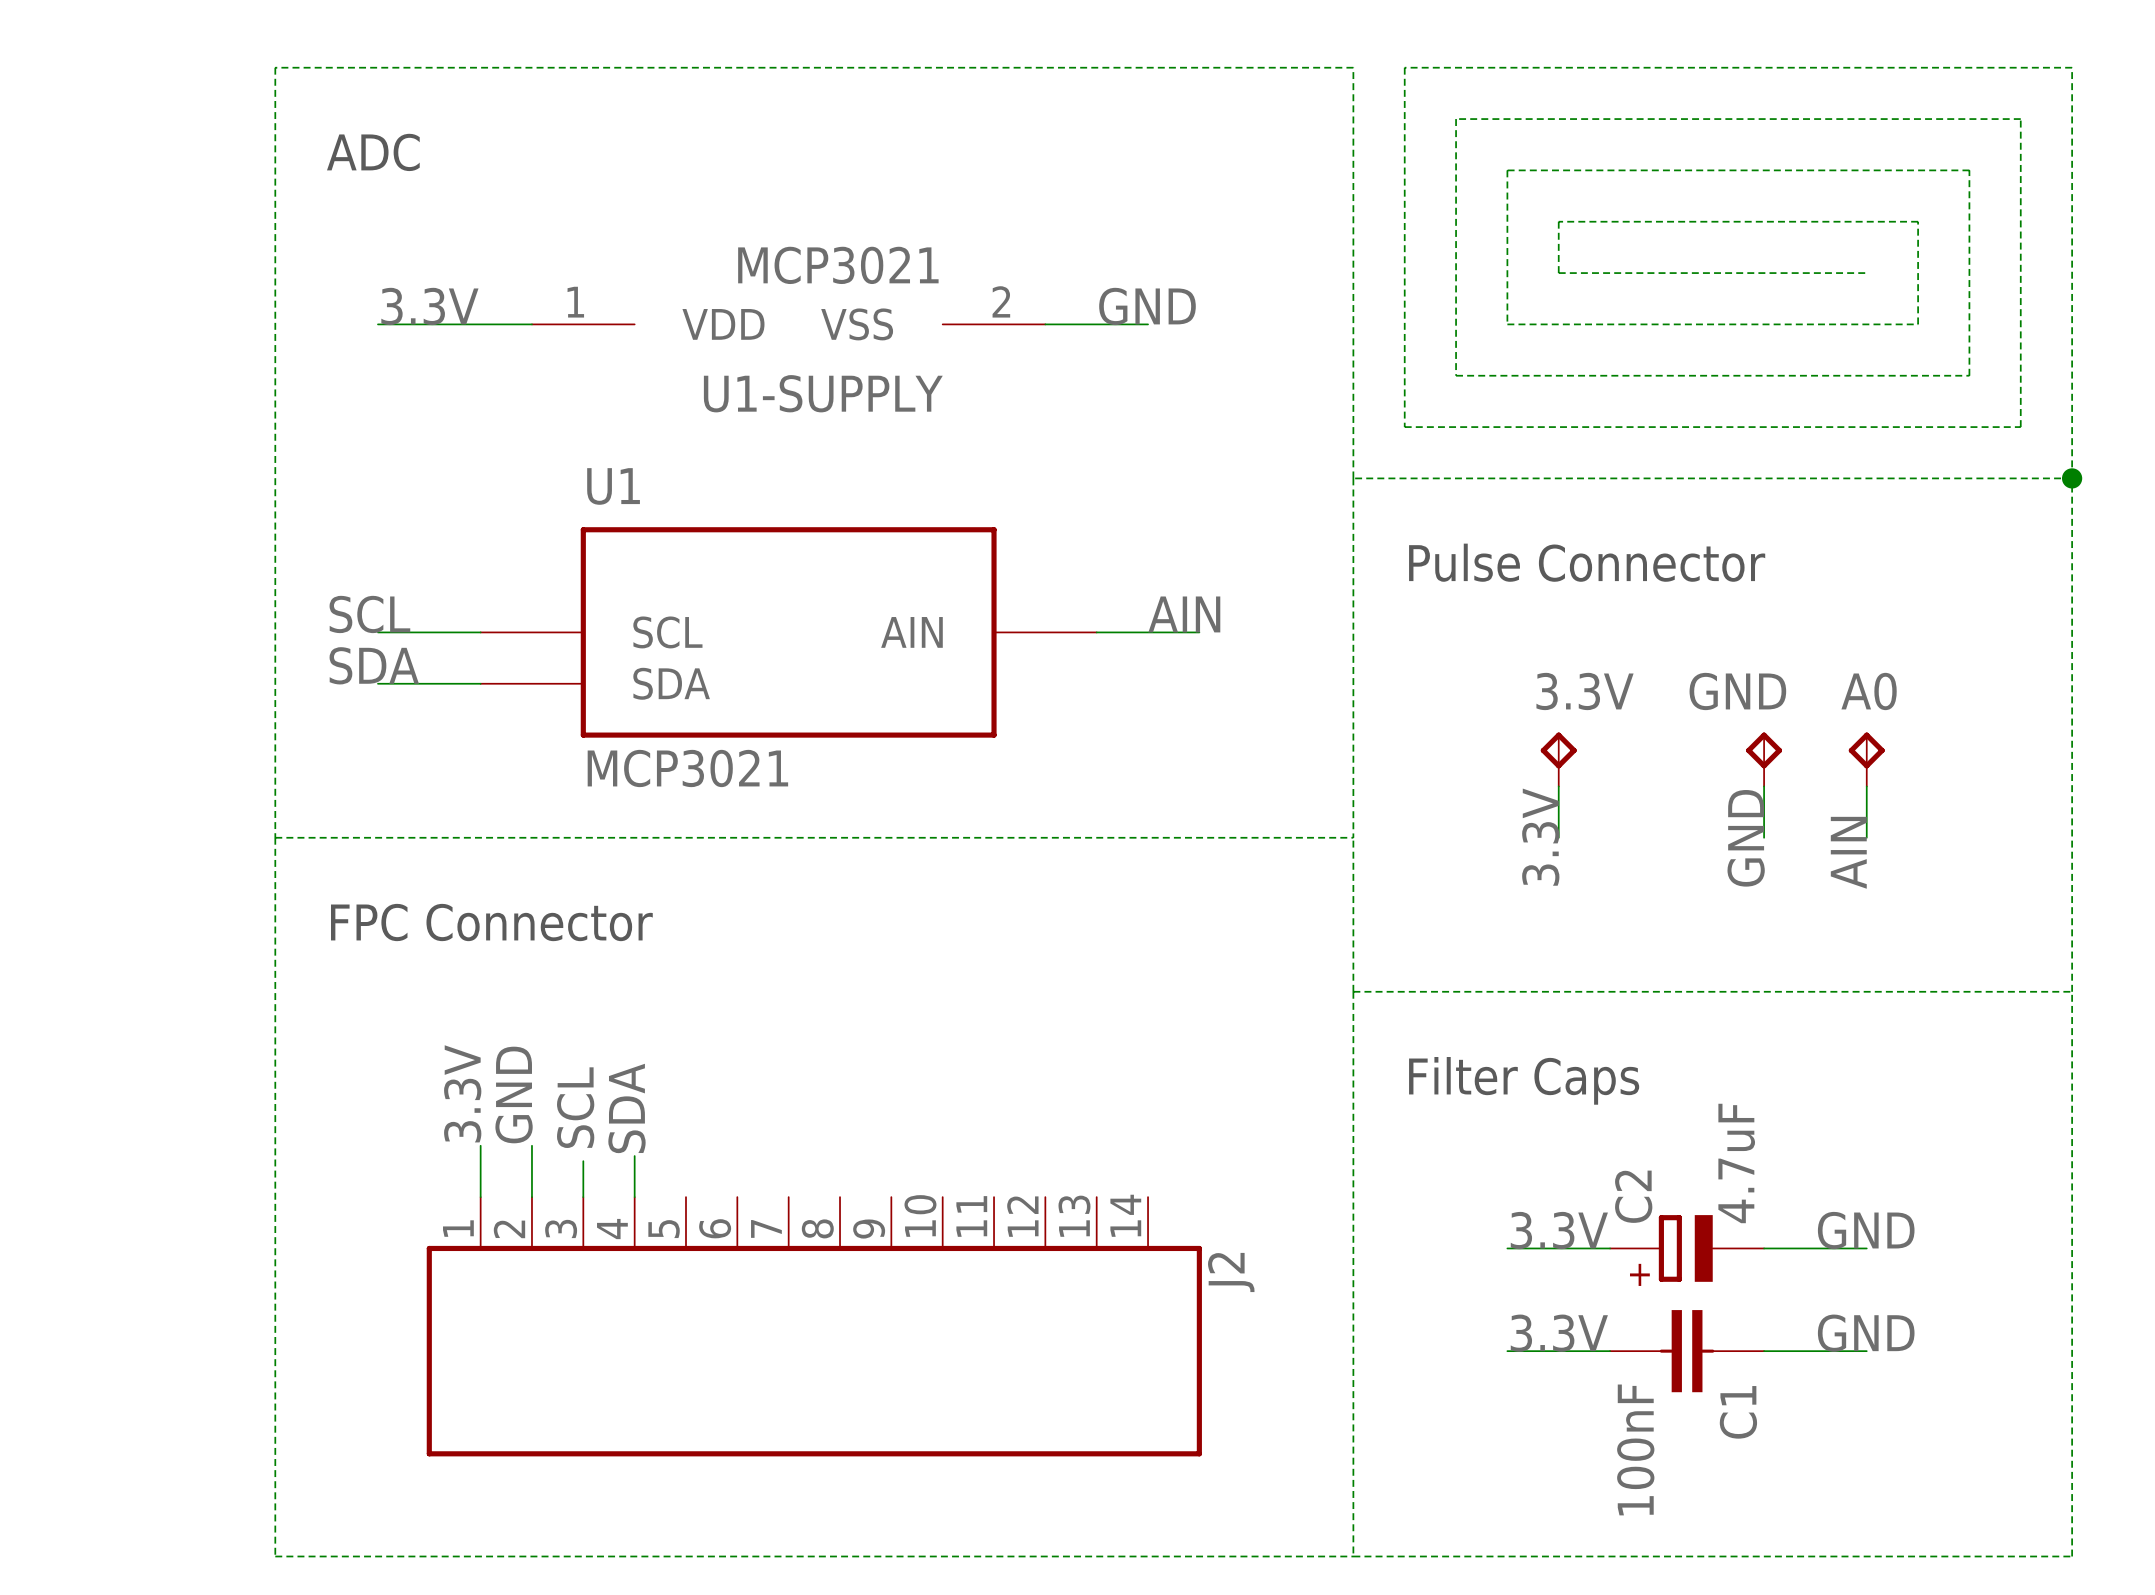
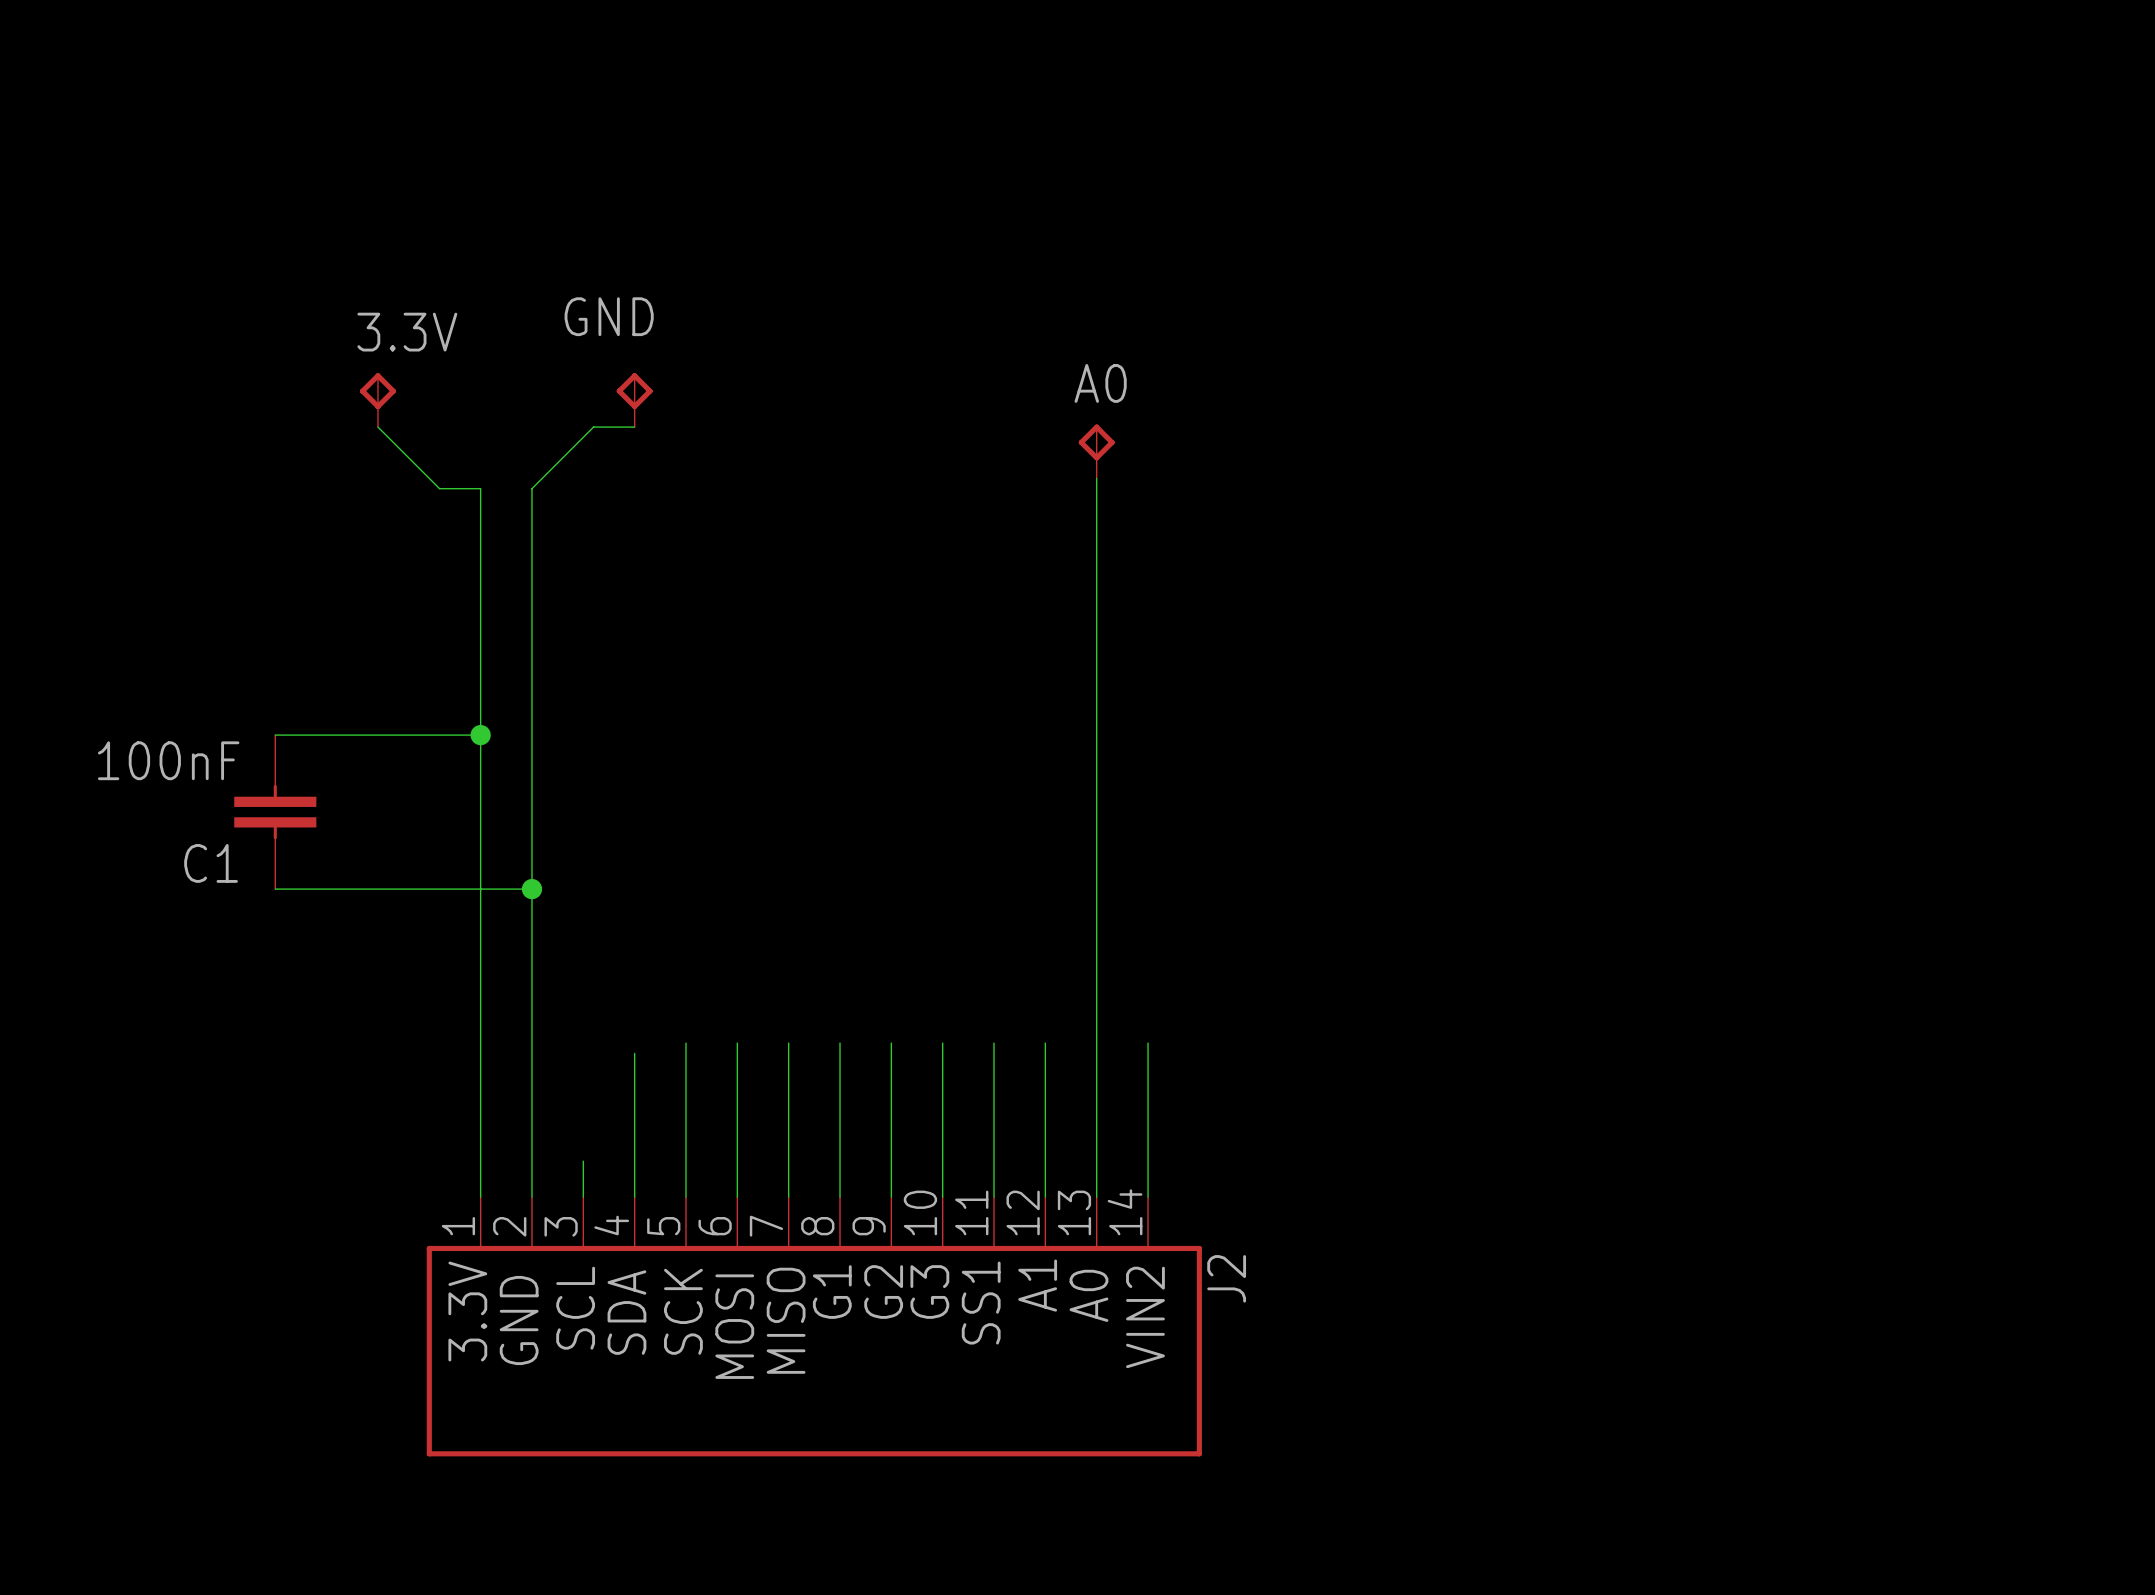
text: ADC (373, 152) -> none
wire: (1866, 273) (1558, 273) (1558, 221) (1918, 221) (1918, 324) (1507, 324) (1507, 170) (1969, 170) (1969, 375) (1456, 375) (1456, 119) (2020, 119) (2020, 427) (1404, 427) (1404, 67) (2072, 67) (2072, 1556) (275, 1556) (275, 67) (1353, 67) (1353, 1556) -> none
label: 3.3V (429, 306) -> none
label: GND (1147, 306) -> none
wire: (377, 324) (531, 324) -> none
U1-SUPPLY: MCP3021 (788, 324) -> none
wire: (1045, 324) (1148, 324) -> none
GND: none -> (634, 400)
wire: none -> (377, 427) (439, 488) (480, 488) (480, 1145)
wire: none -> (634, 427) (593, 427) (531, 488) (531, 1145)
wire: none -> (1096, 478) (1096, 1197)
wire: (1353, 478) (2072, 478) -> none
junction: (2072, 478) -> none
text: Pulse Connector (1587, 562) -> none
label: SCL (369, 614) -> none
label: AIN (1184, 614) -> none
wire: (377, 632) (480, 632) -> none
U1: MCP3021 (788, 632) -> none
wire: (1096, 632) (1199, 632) -> none
label: SDA (374, 665) -> none
wire: (377, 683) (480, 683) -> none
wire: none -> (275, 735) (480, 735)
junction: none -> (480, 735)
3.3V position: (1558, 759) -> (377, 400)
GND: (1764, 759) -> none
A0 position: (1866, 759) -> (1096, 451)
wire: (1558, 786) (1558, 837) -> none
wire: (1764, 786) (1764, 837) -> none
wire: (1866, 786) (1866, 837) -> none
wire: (275, 837) (1353, 837) -> none
label: 3.3V (1540, 837) -> none
label: GND (1746, 838) -> none
label: AIN (1848, 852) -> none
wire: none -> (275, 889) (531, 889)
junction: none -> (531, 889)
text: FPC Connector (491, 922) -> none
wire: (1353, 991) (2072, 991) -> none
wire: none -> (685, 1043) (685, 1197)
wire: none -> (737, 1043) (737, 1197)
wire: none -> (788, 1043) (788, 1197)
wire: none -> (840, 1043) (840, 1197)
wire: none -> (891, 1043) (891, 1197)
wire: none -> (942, 1043) (942, 1197)
wire: none -> (994, 1043) (994, 1197)
wire: none -> (1045, 1043) (1045, 1197)
wire: none -> (1148, 1043) (1148, 1197)
wire: none -> (634, 1053) (634, 1156)
text: Filter Caps (1524, 1080) -> none
label position: 3.3V (462, 1093) -> 3.3V (467, 1311)
label position: GND (514, 1095) -> GND (519, 1320)
label position: SCL (575, 1107) -> SCL (575, 1308)
label position: SDA (626, 1108) -> SDA (626, 1312)
label: 3.3V (1559, 1230) -> none
label: GND (1866, 1230) -> none
wire: (1507, 1248) (1610, 1248) -> none
C2: 4.7uF (1687, 1248) -> none
wire: (1764, 1248) (1866, 1248) -> none
label: none -> A1 (1037, 1285)
label: none -> G1 (832, 1292)
label: none -> G3 (929, 1292)
label: none -> G2 (883, 1292)
label: none -> A0 (1088, 1295)
label: none -> SS1 (981, 1303)
label: none -> SCK (683, 1311)
label: none -> VIN2 (1145, 1317)
label: none -> MISO (786, 1320)
label: none -> MOSI (734, 1326)
label: 3.3V (1559, 1333) -> none
label: GND (1866, 1333) -> none
wire: (1507, 1351) (1610, 1351) -> none
C1 rotation: 0° (1687, 1351) -> 90° clockwise (275, 812)
C1 position: (1687, 1351) -> (275, 812)
wire: (1764, 1351) (1866, 1351) -> none

